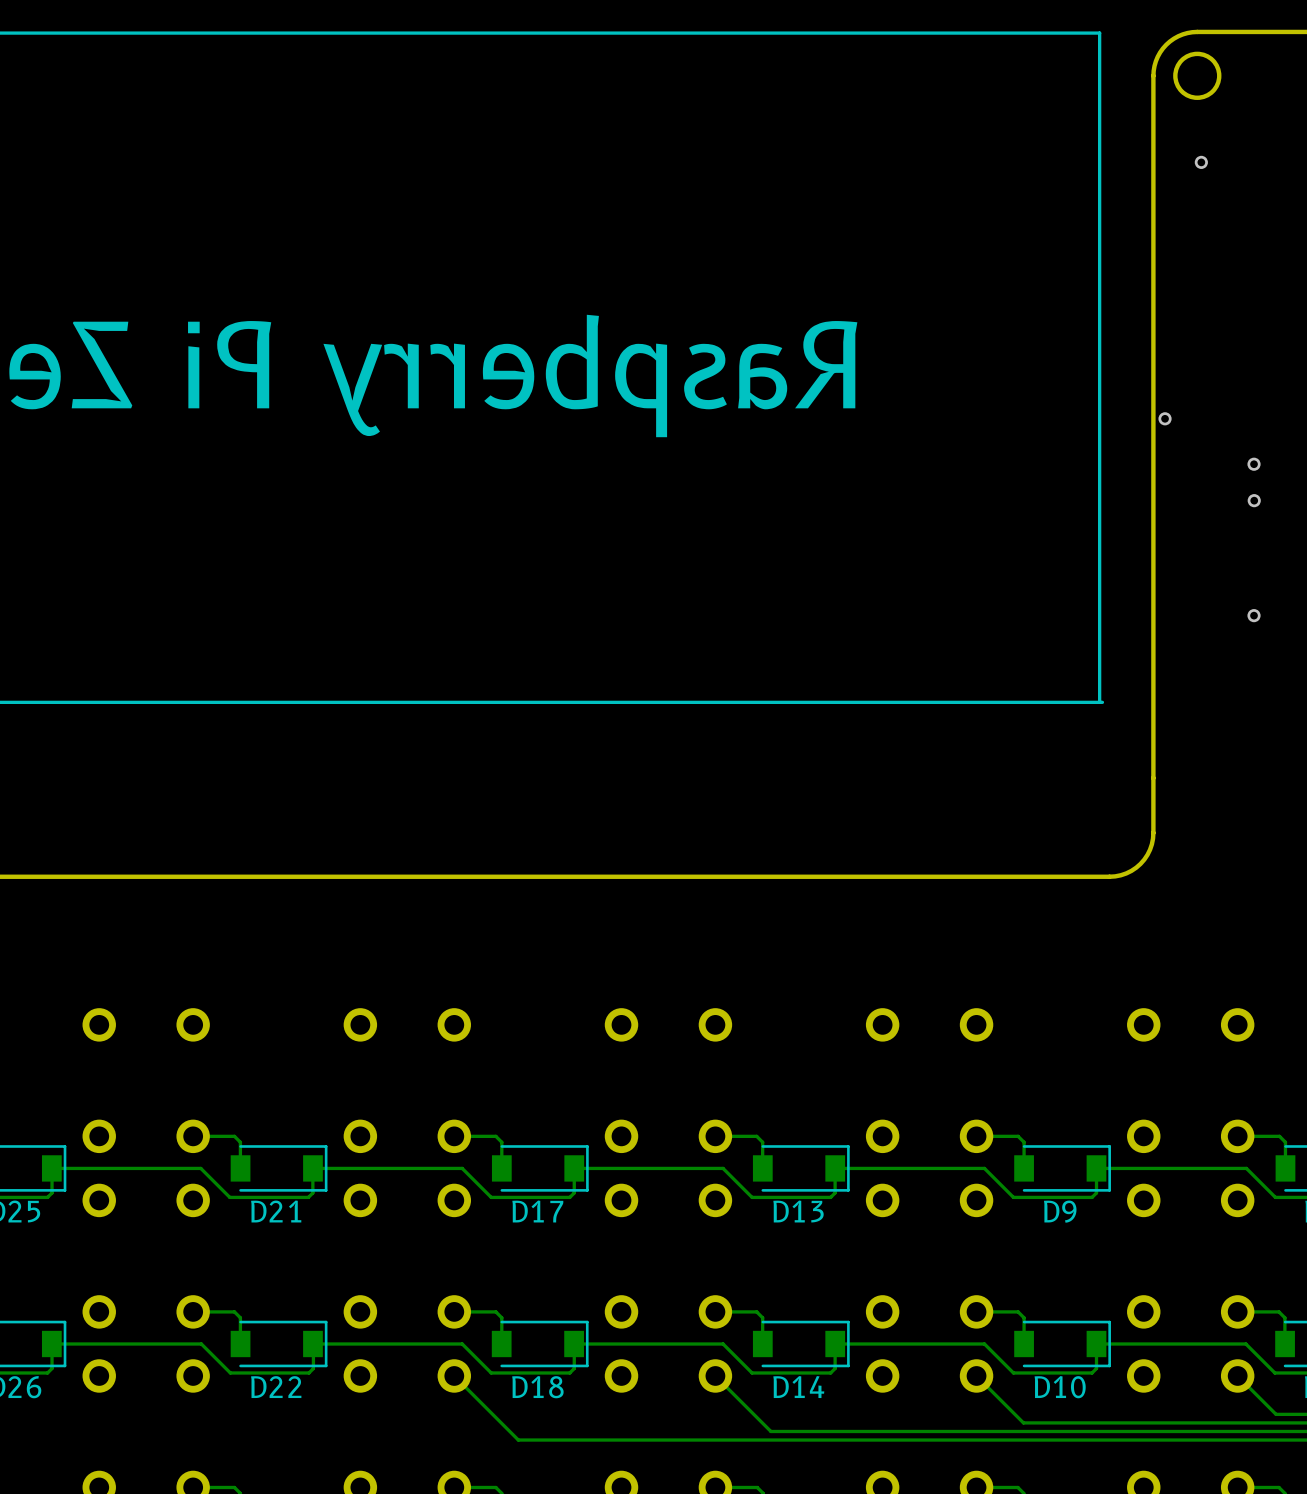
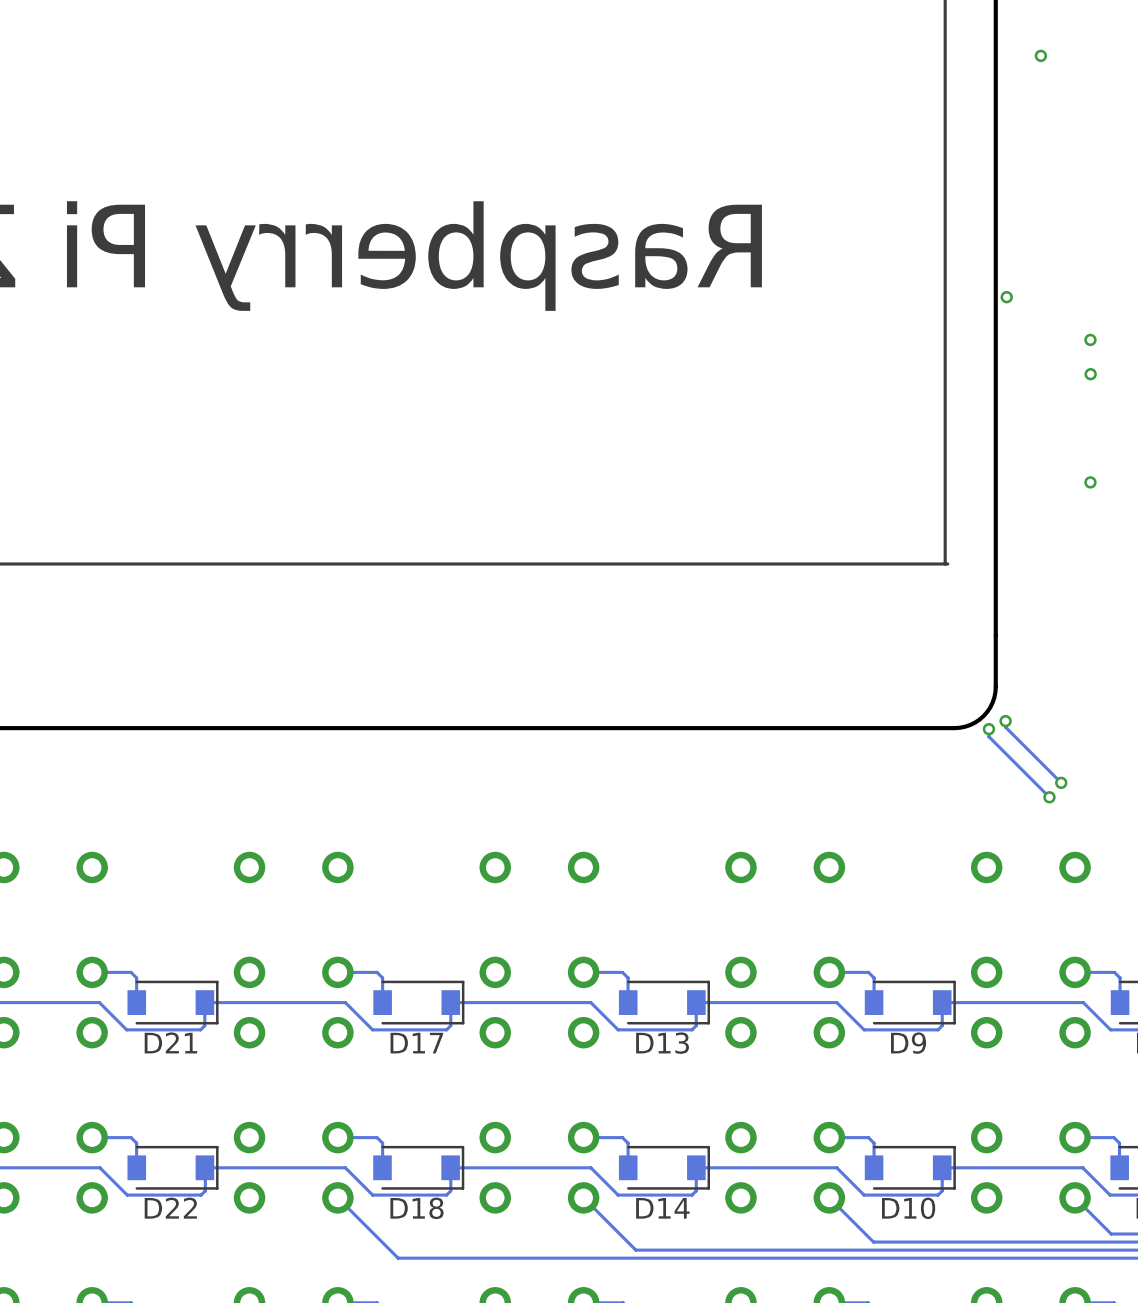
track: none -> (1005, 721) (1005, 727) (1061, 782)
via: none -> (1005, 721)
track: none -> (988, 729) (988, 736) (1049, 797)
via: none -> (988, 729)
via: none -> (1061, 782)
via: none -> (1049, 797)

